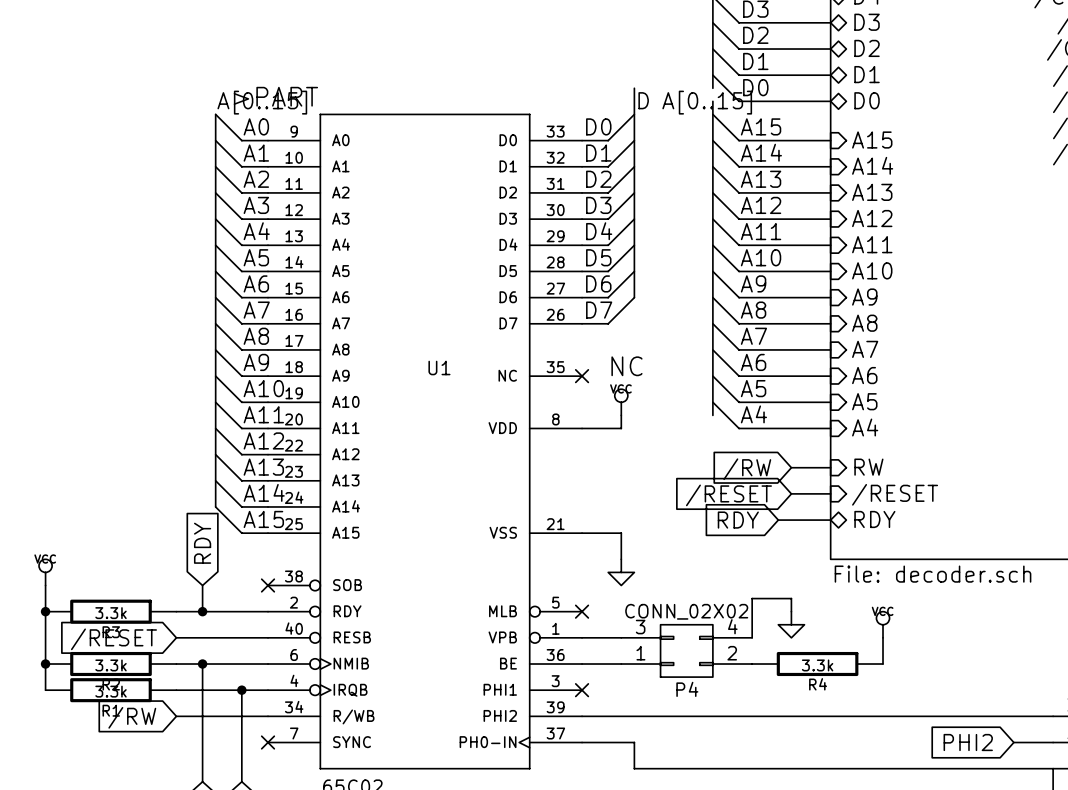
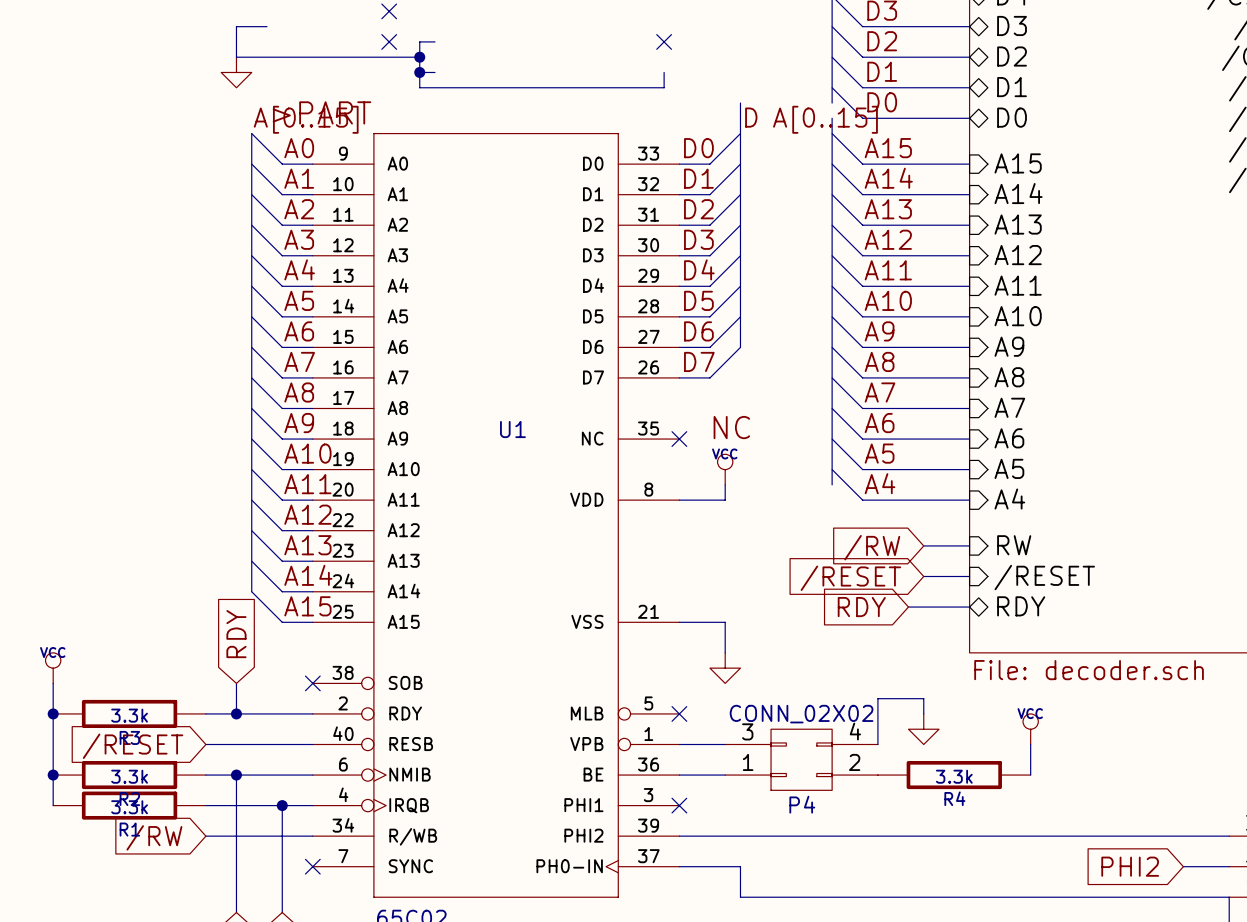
no-connect mark: none -> (389, 11)
wire: none -> (267, 26) (236, 26) (236, 57) (419, 57)
no-connect mark: none -> (389, 41)
wire: none -> (435, 41) (419, 41) (419, 87) (664, 87) (664, 72)
no-connect mark: none -> (664, 41)
junction: none -> (419, 57)
power symbol: none -> (236, 72)
wire: none -> (419, 72) (435, 72)
junction: none -> (419, 72)

